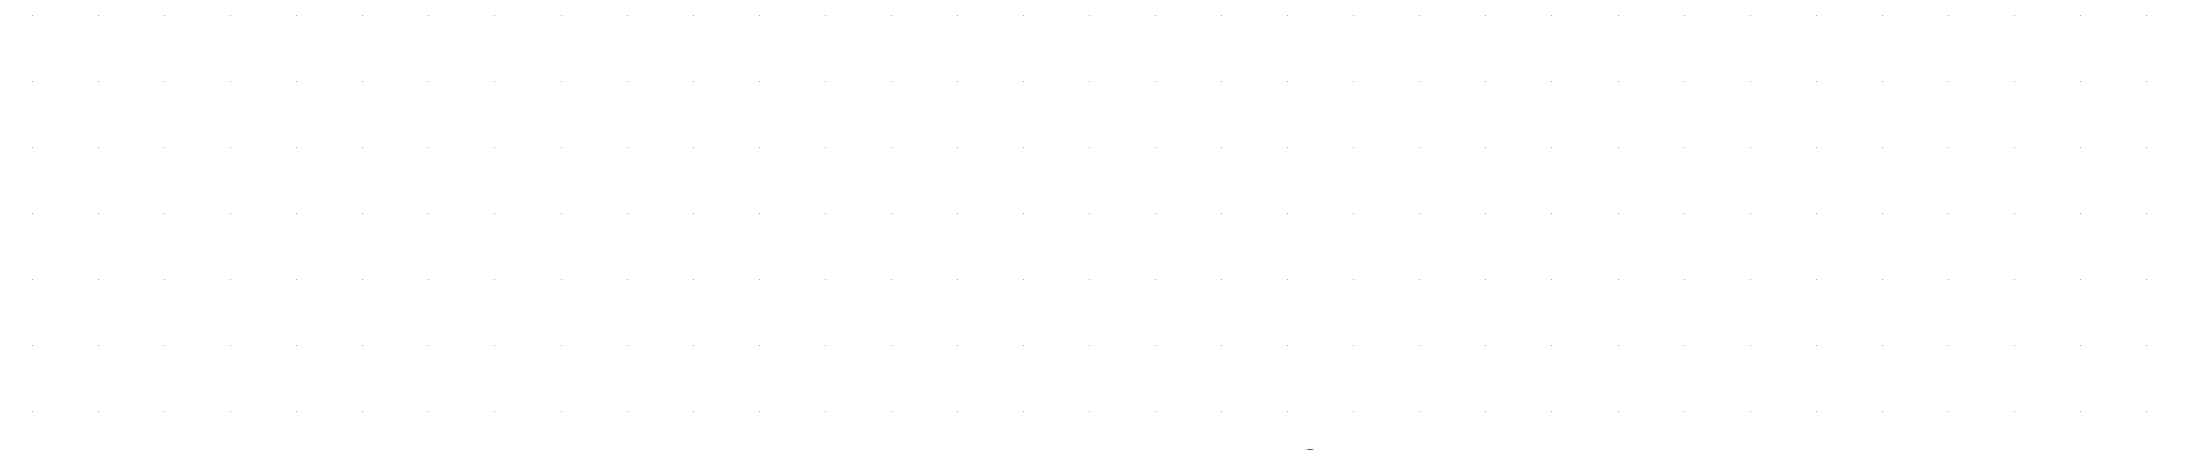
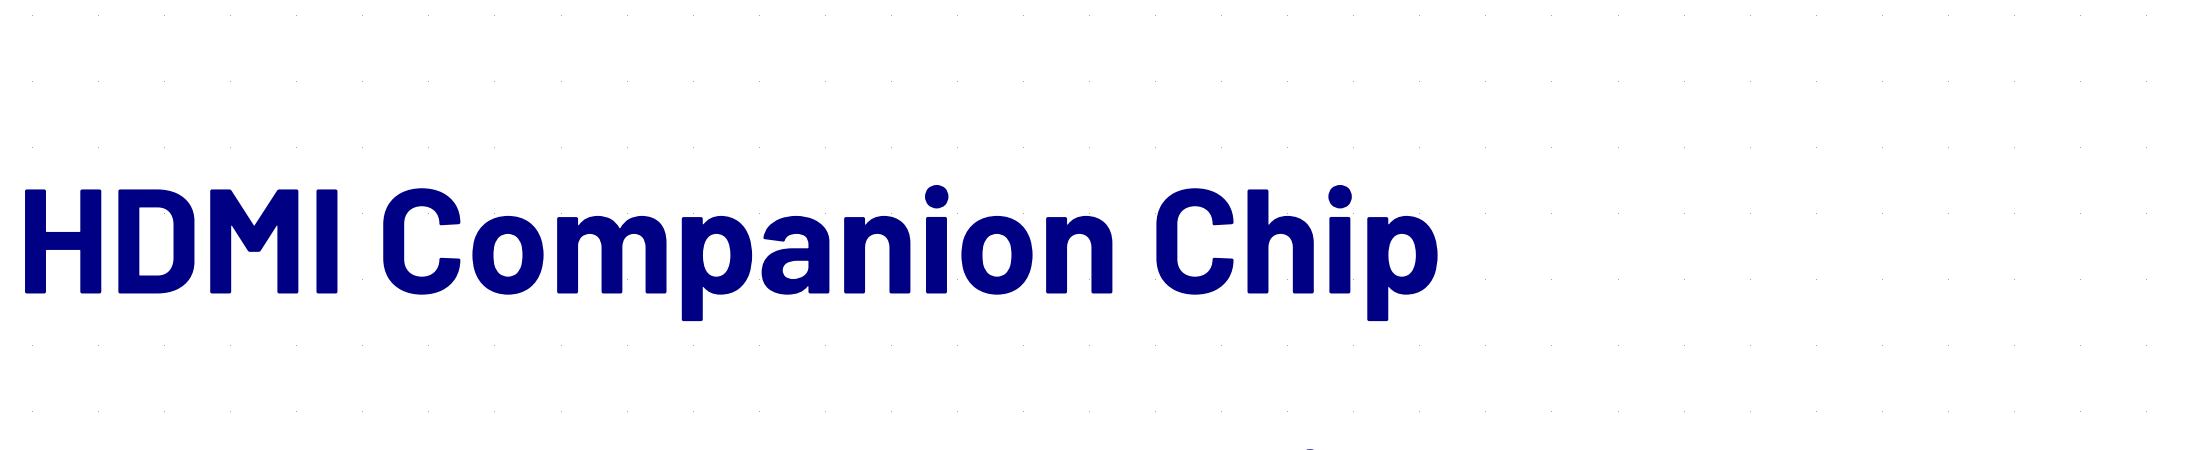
text: none -> HDMI Companion Chip (731, 253)

